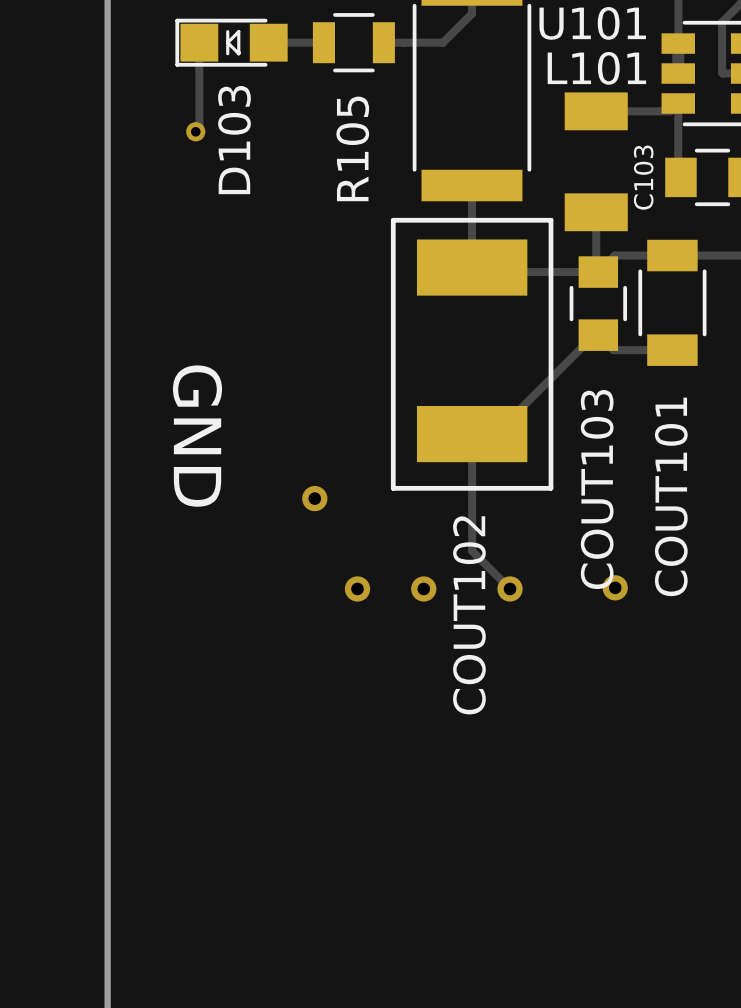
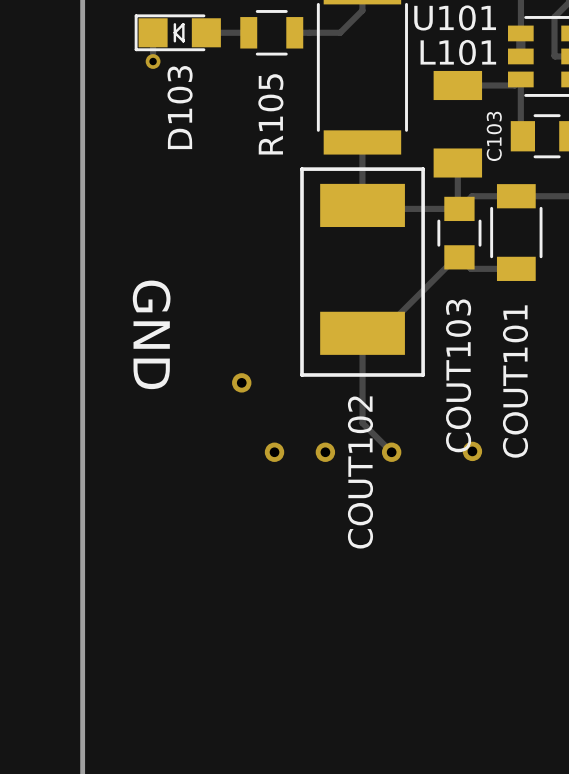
track: (199, 80) (199, 128) (195, 131) -> none
via position: (195, 131) -> (153, 61)

